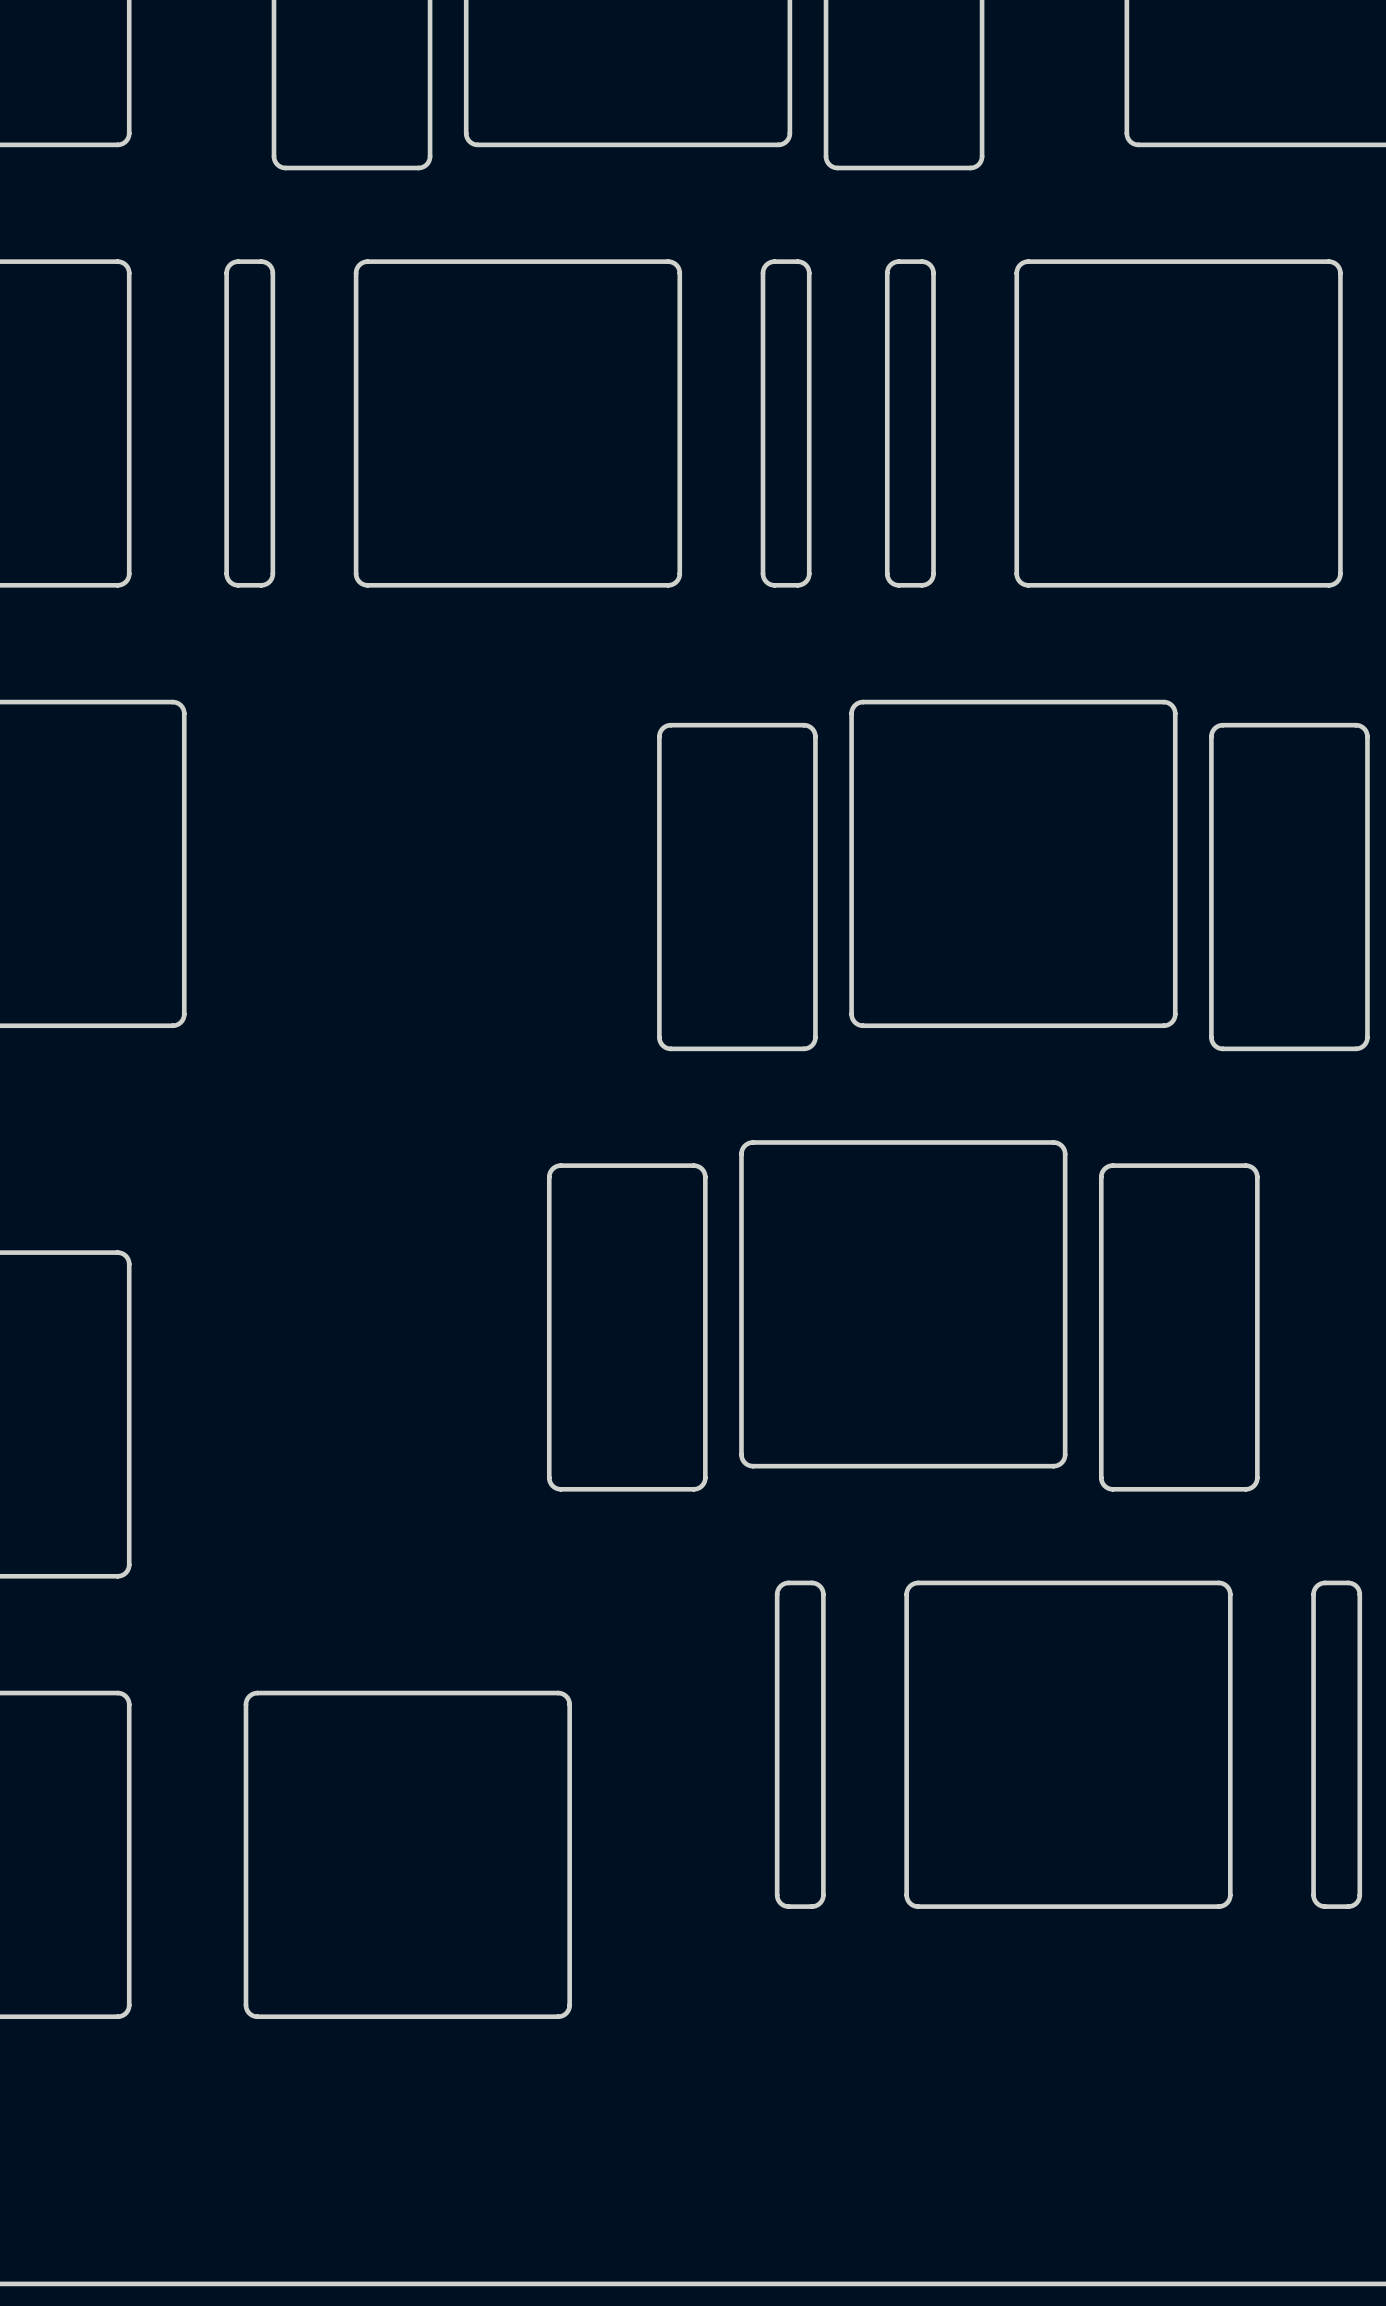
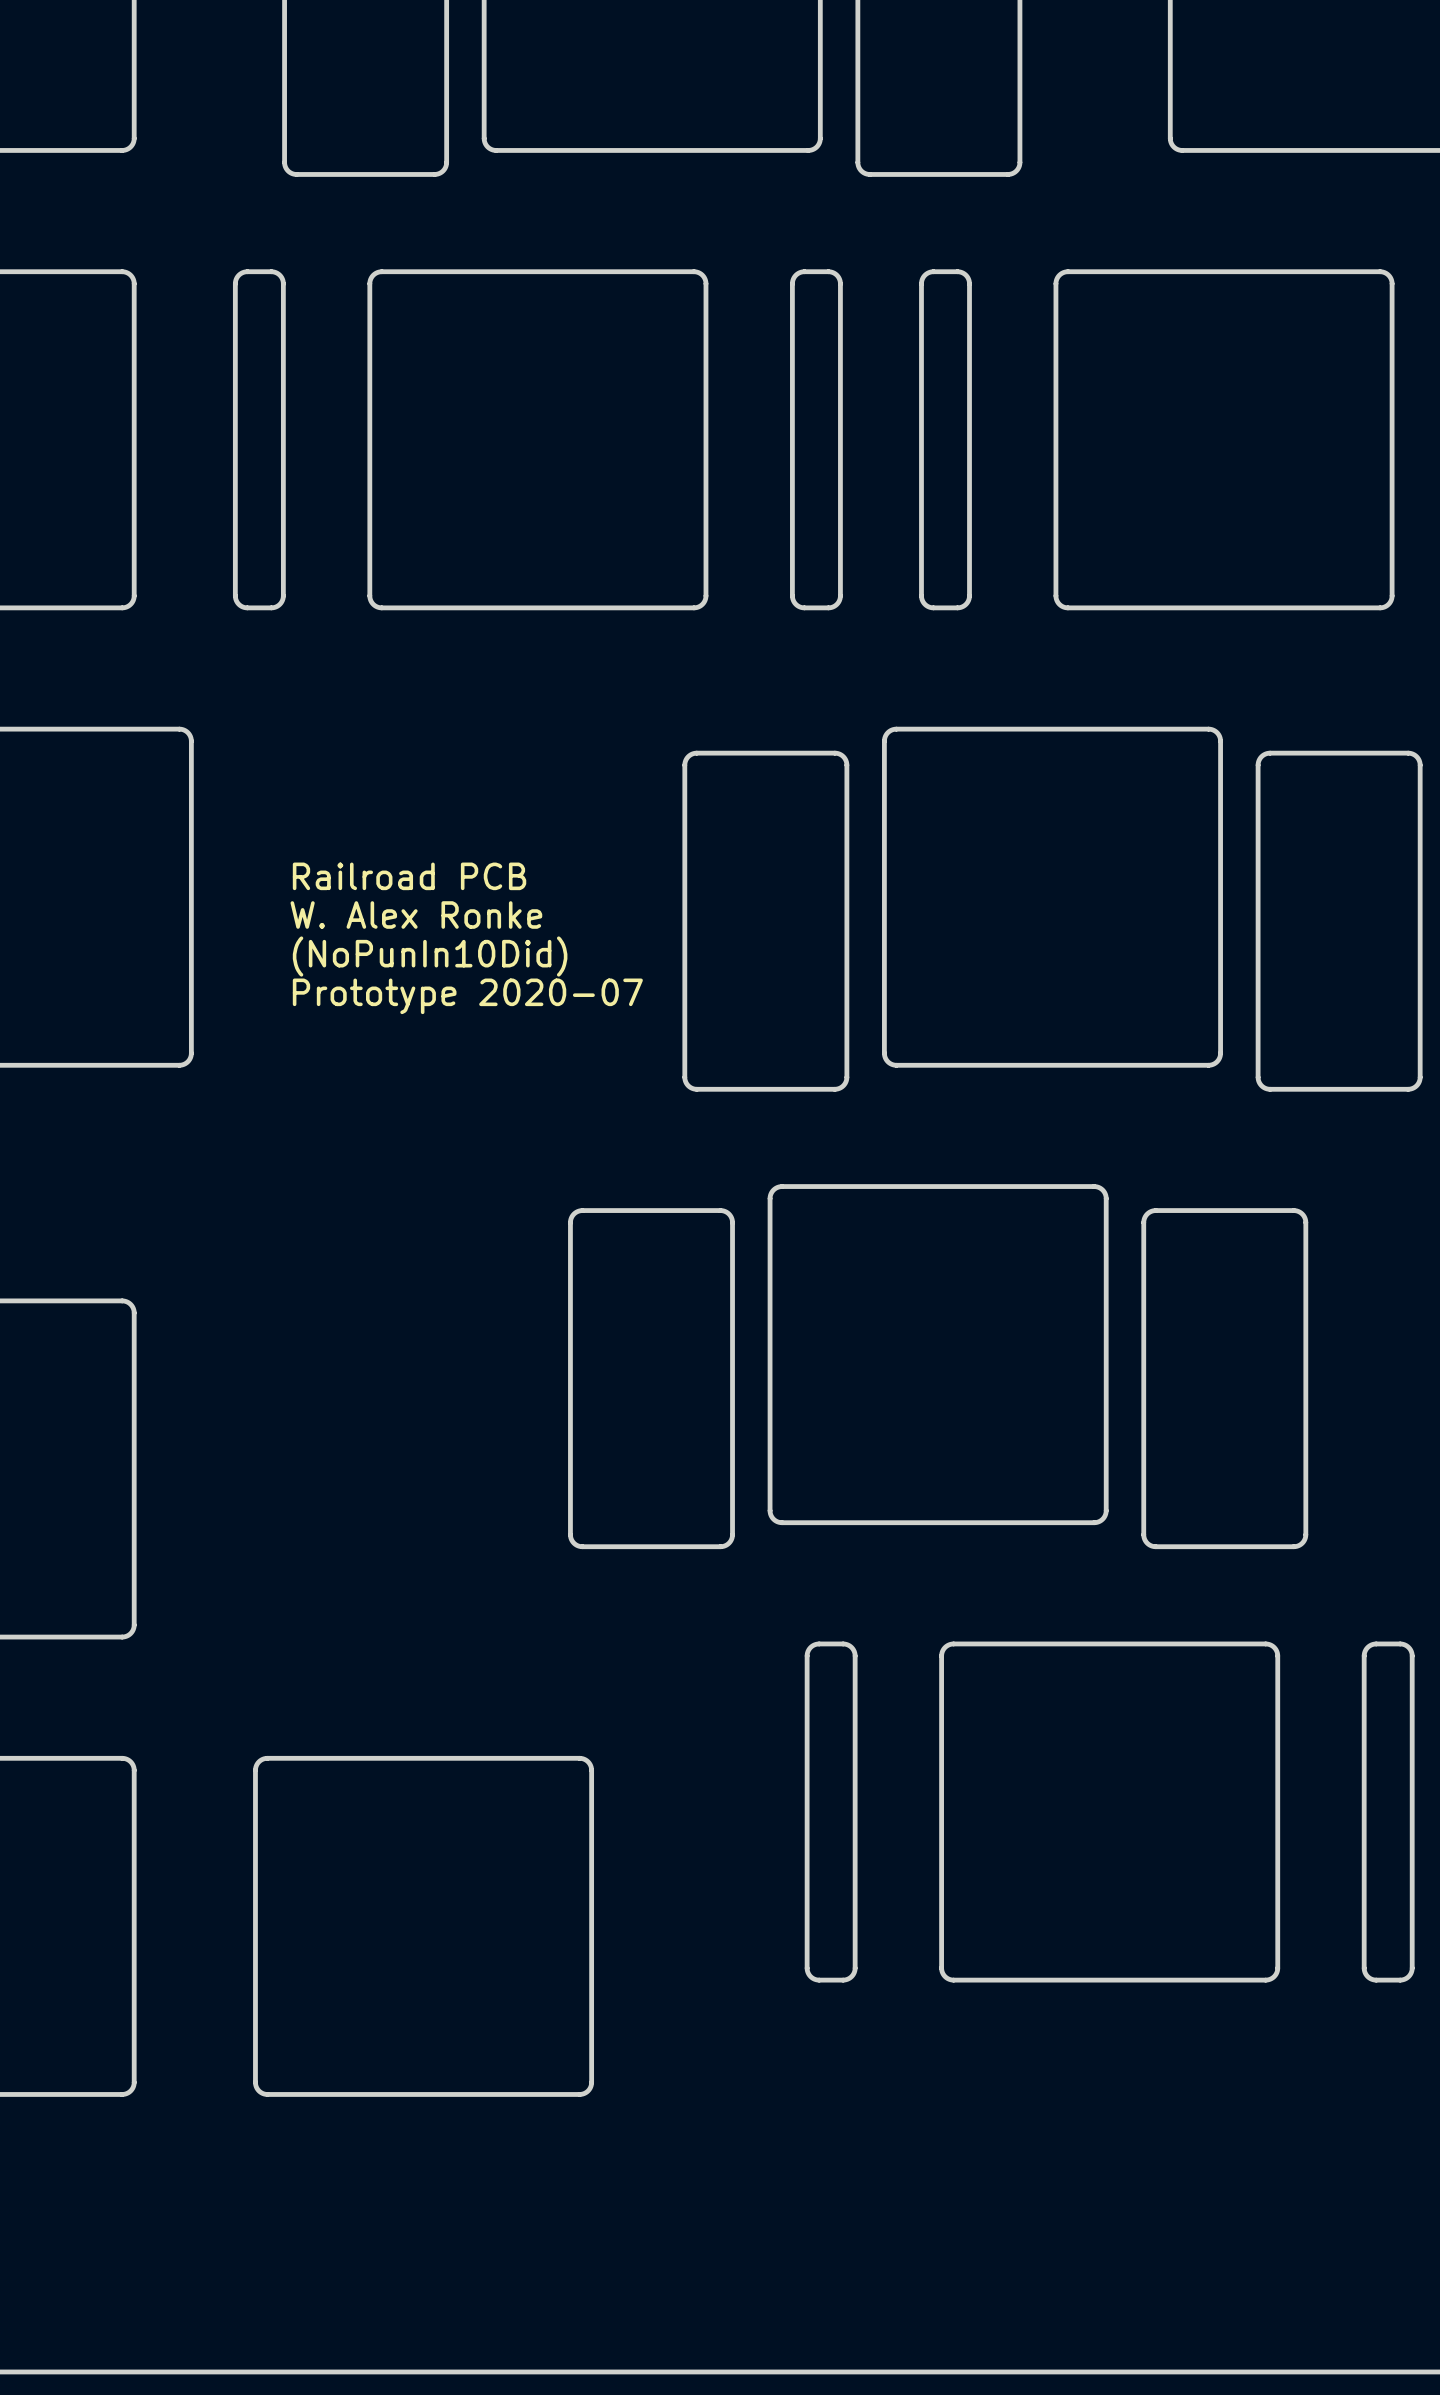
text: none -> Railroad PCB (409, 876)
text: none -> W. Alex Ronke (416, 915)
text: none -> (NoPunIn10Did) (430, 956)
text: none -> Prototype 2020-07 (467, 996)

